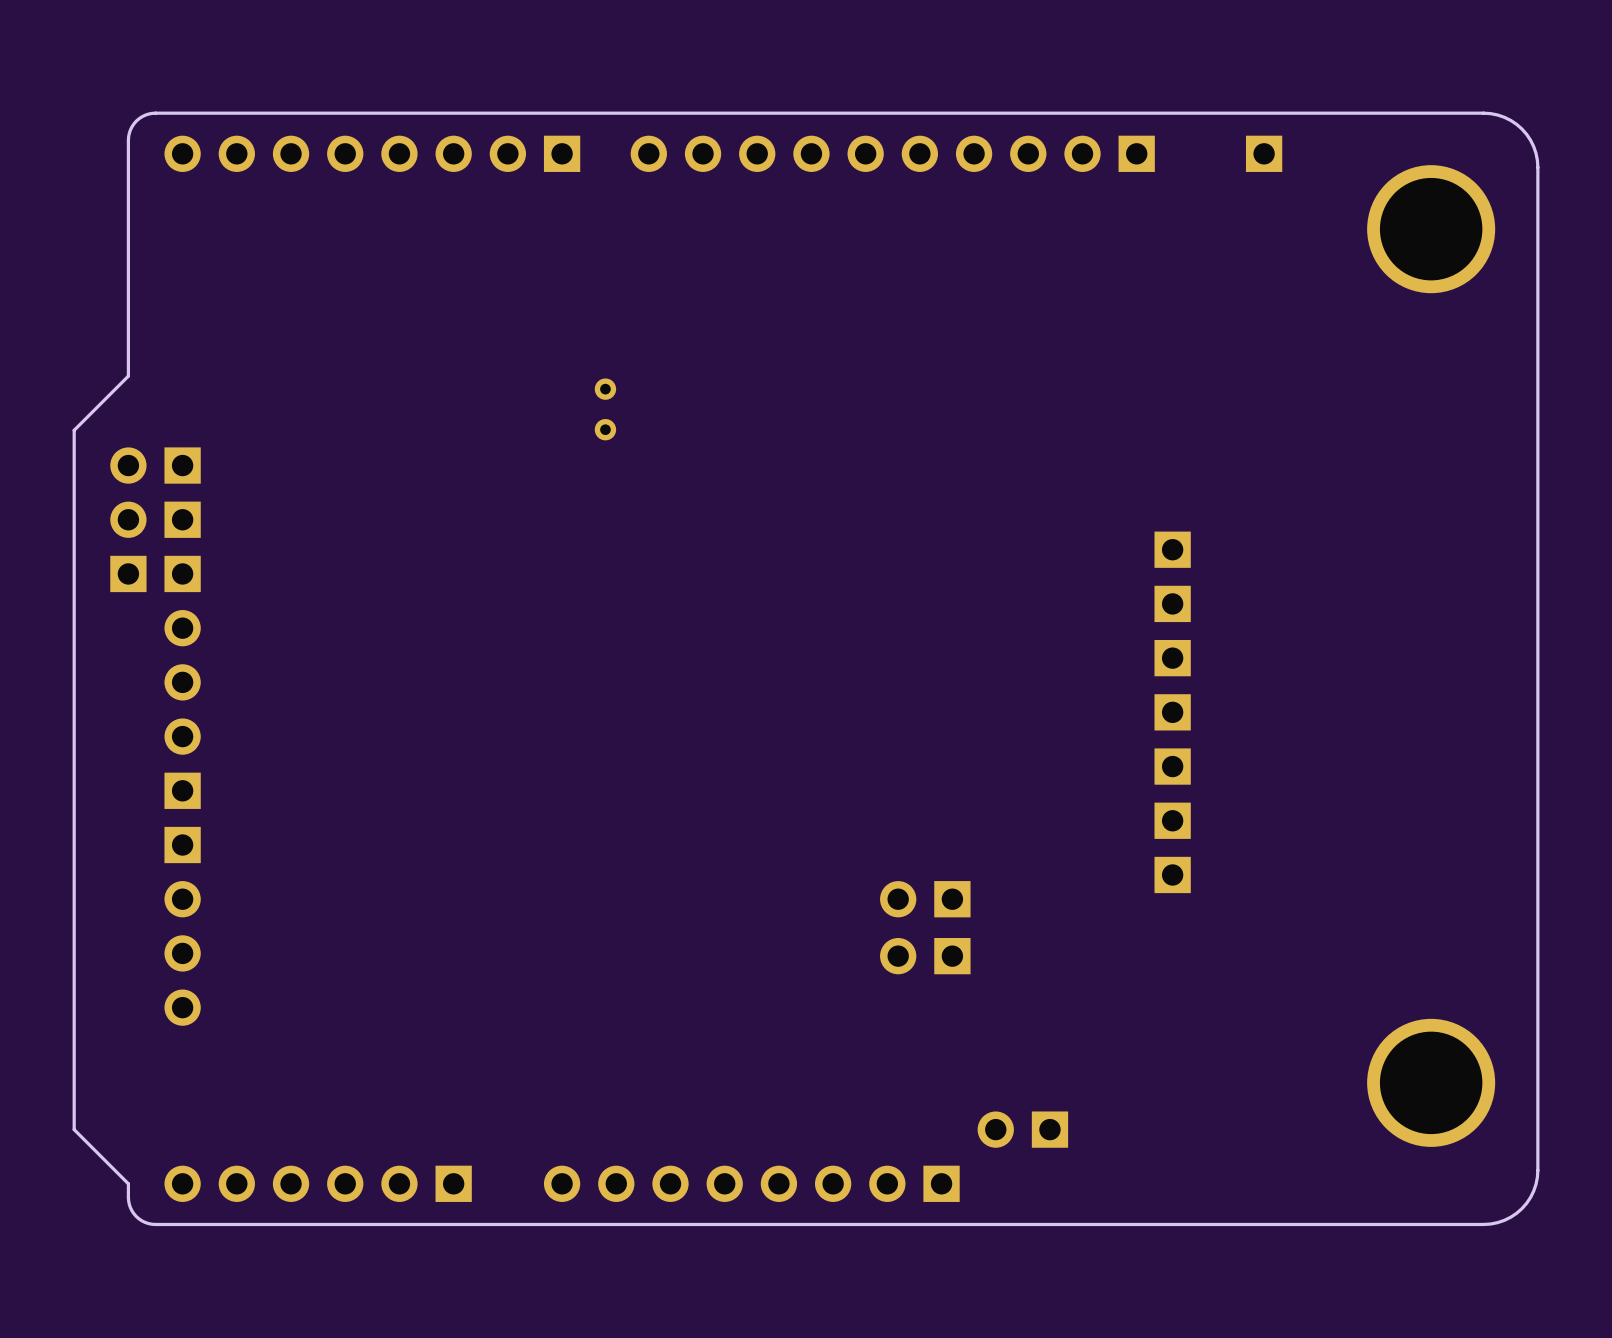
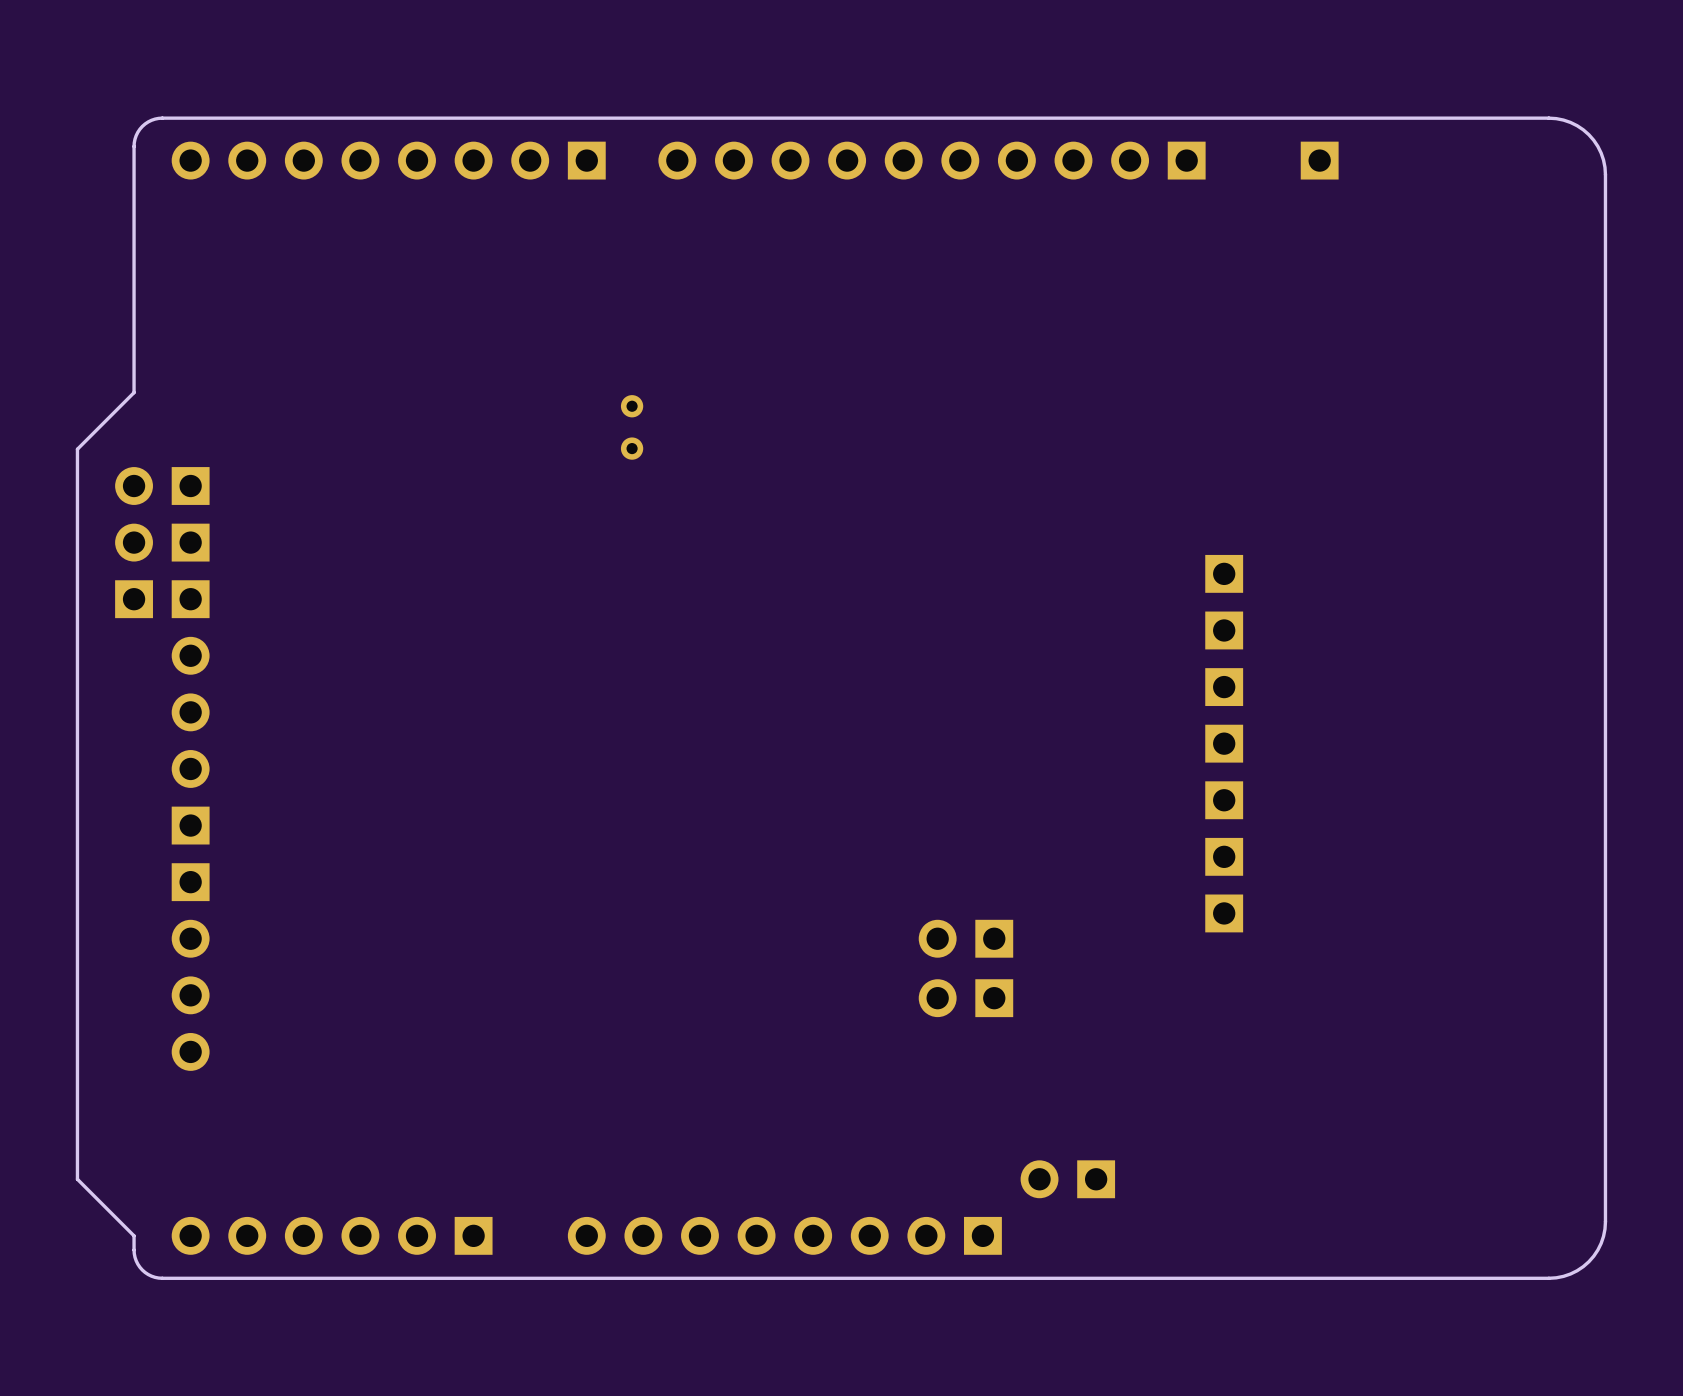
part: (1431, 229) -> none
part: (1431, 1082) -> none

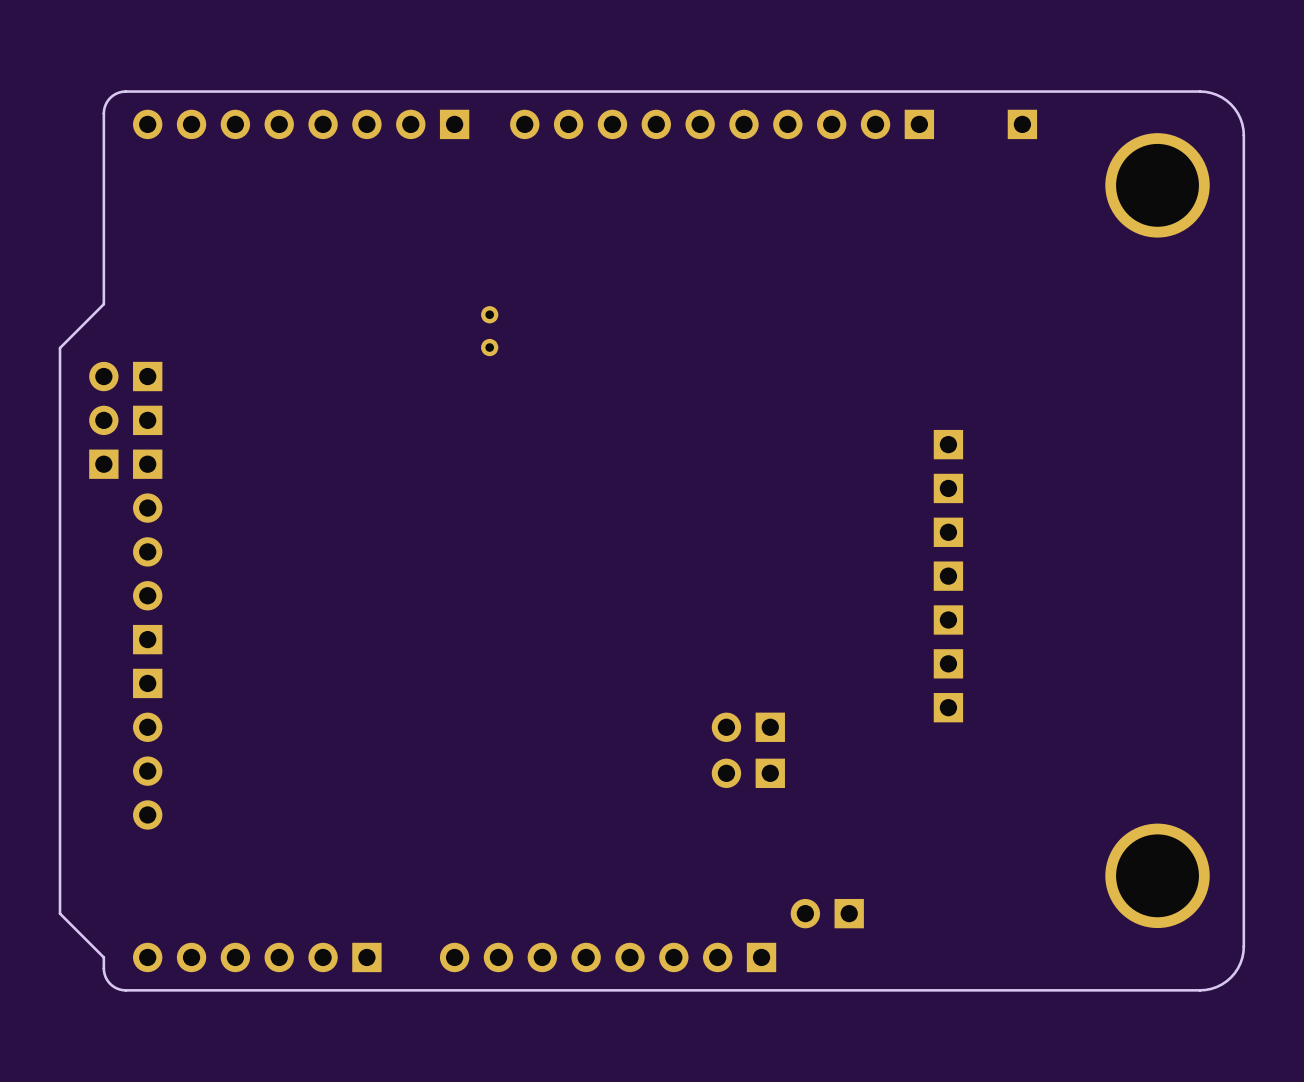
part: none -> (1157, 185)
part: none -> (1157, 875)

